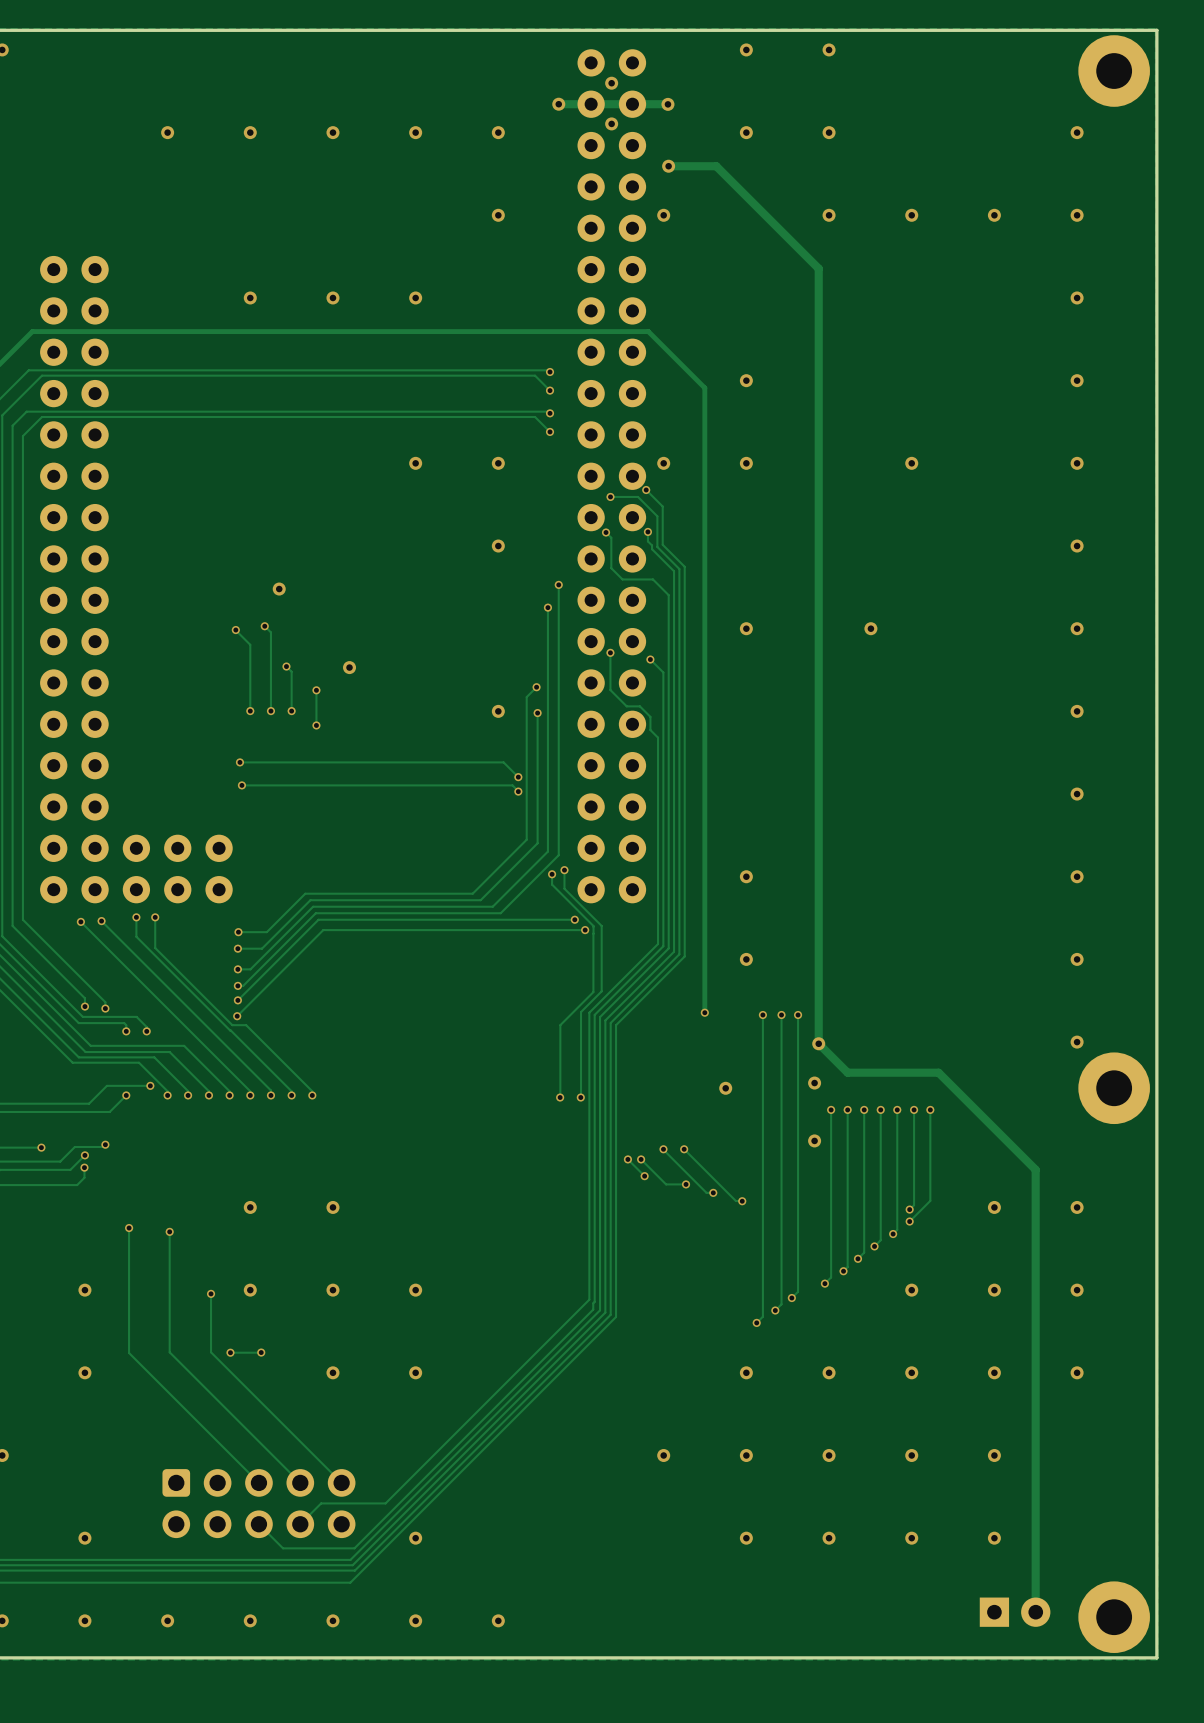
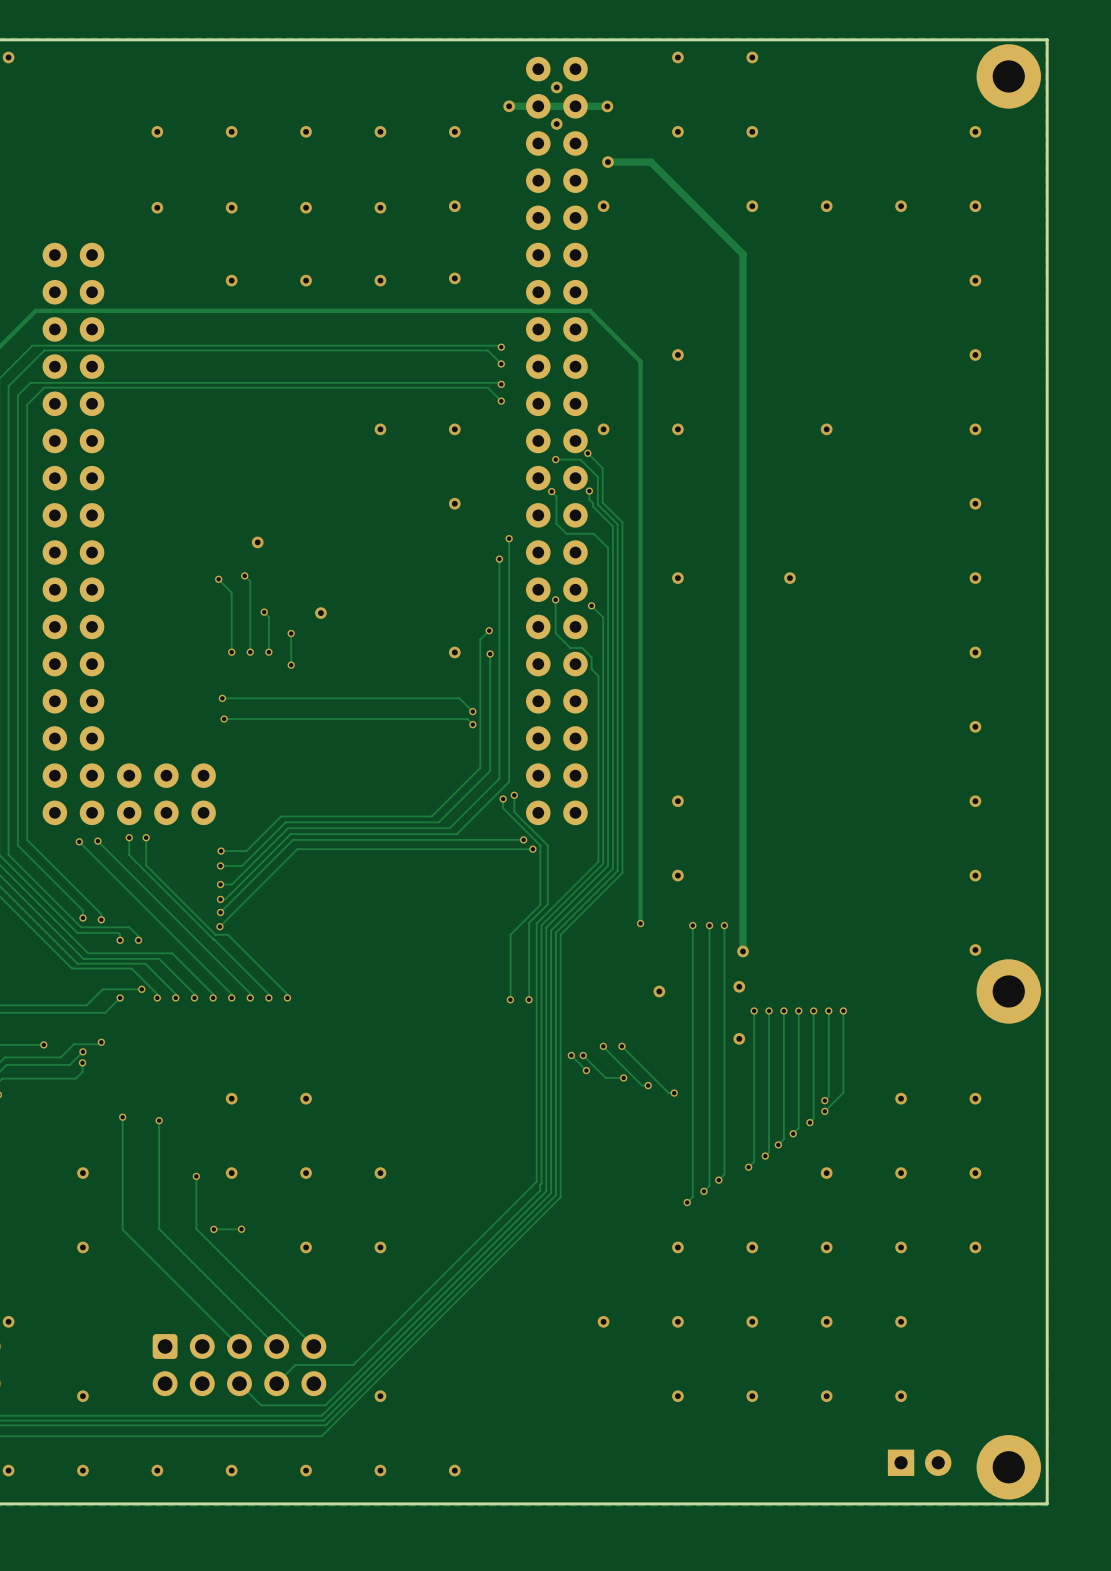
via: none -> (157, 207)
via: none -> (231, 207)
via: none -> (306, 207)
via: none -> (380, 207)
via: none -> (454, 278)
track: (818, 1043) (847, 1072) (938, 1072) (1035, 1169) (1035, 1612) -> none

